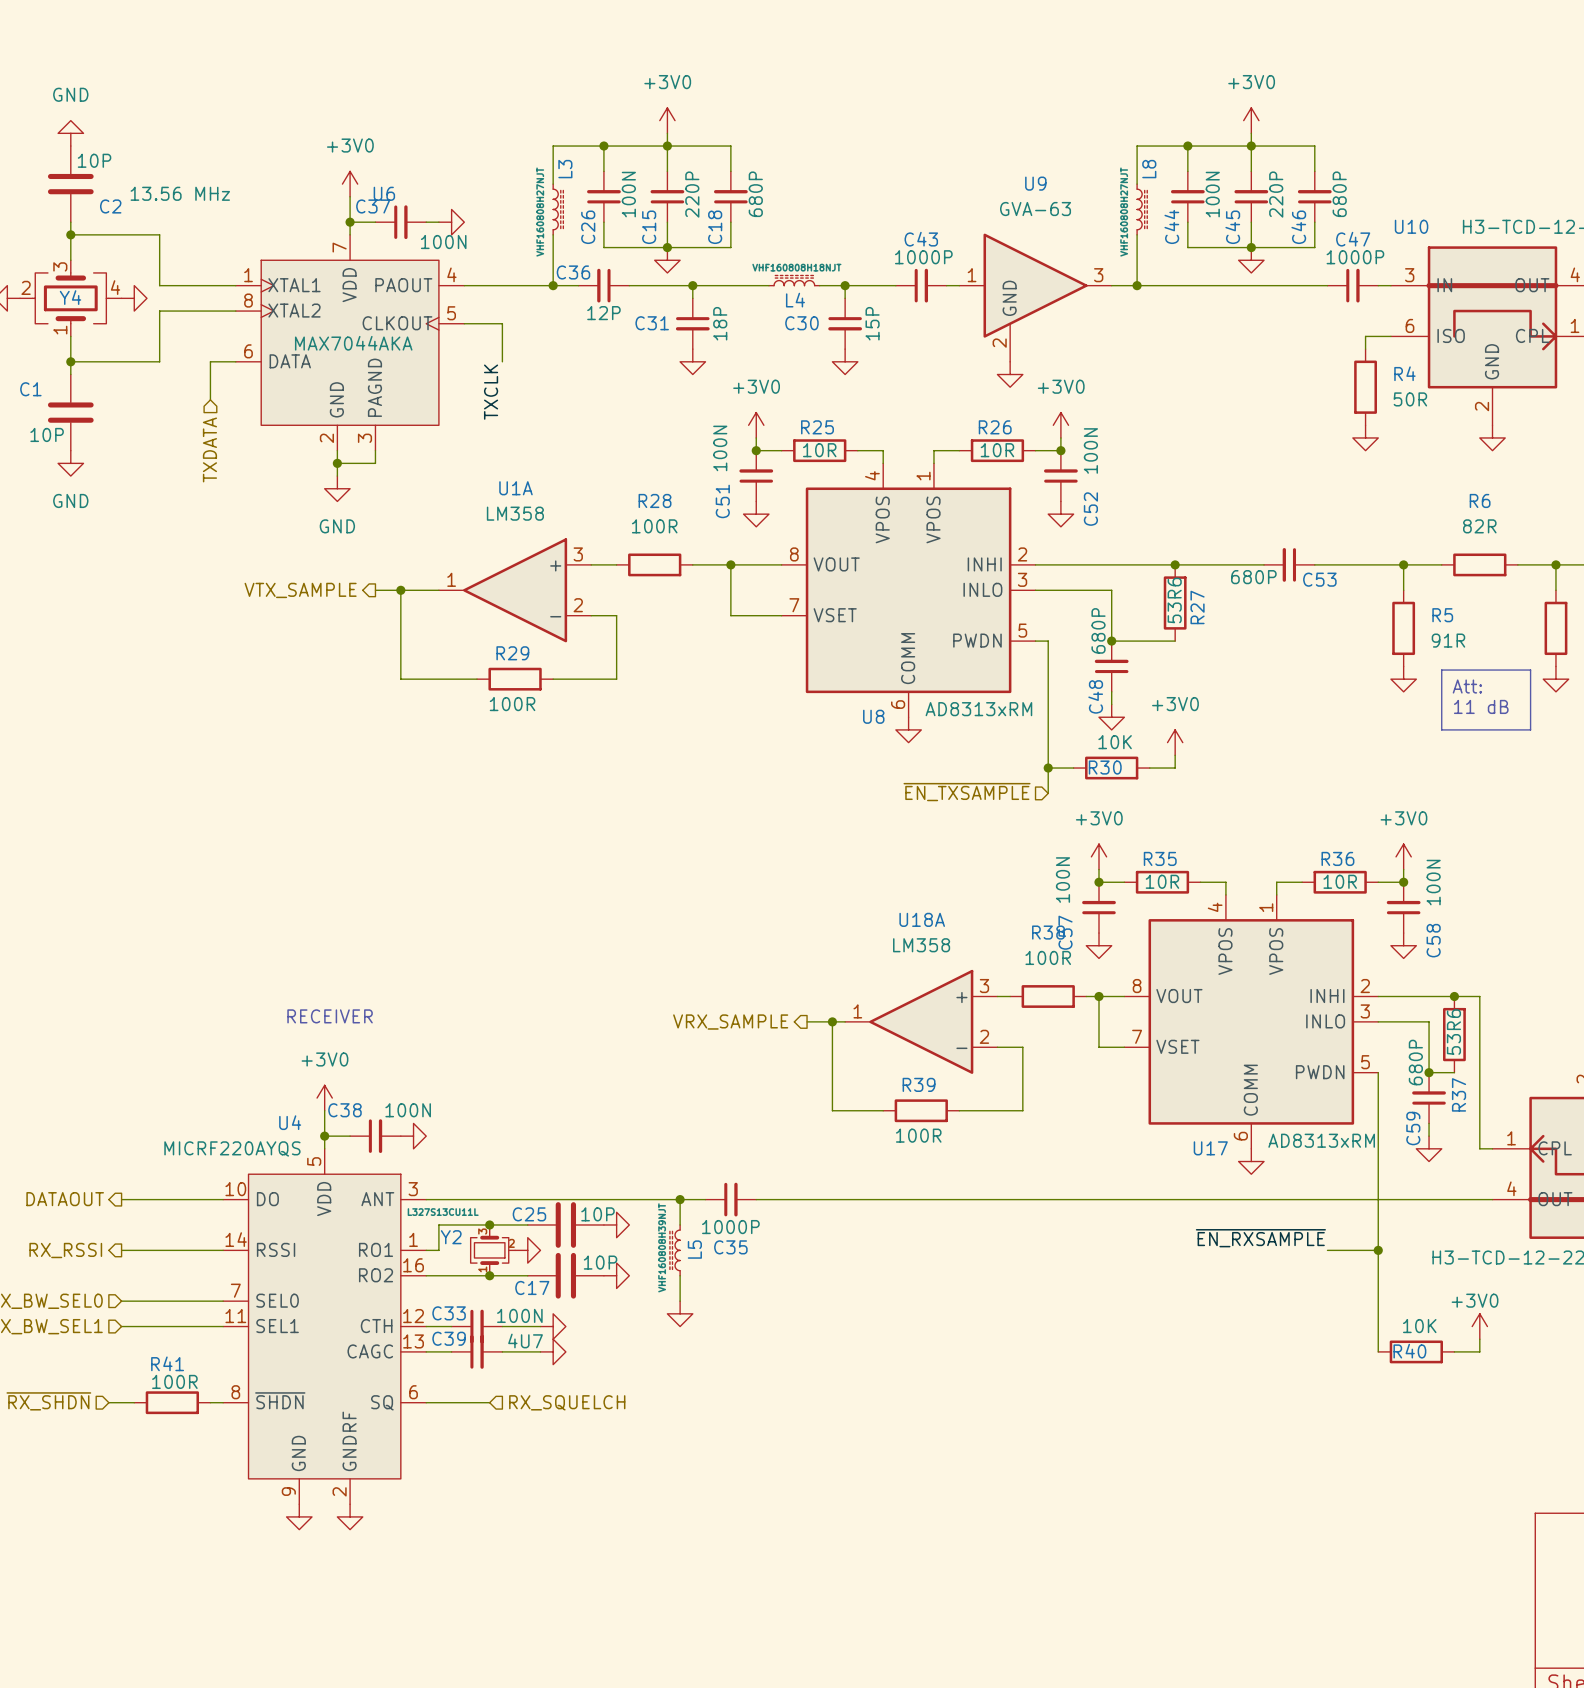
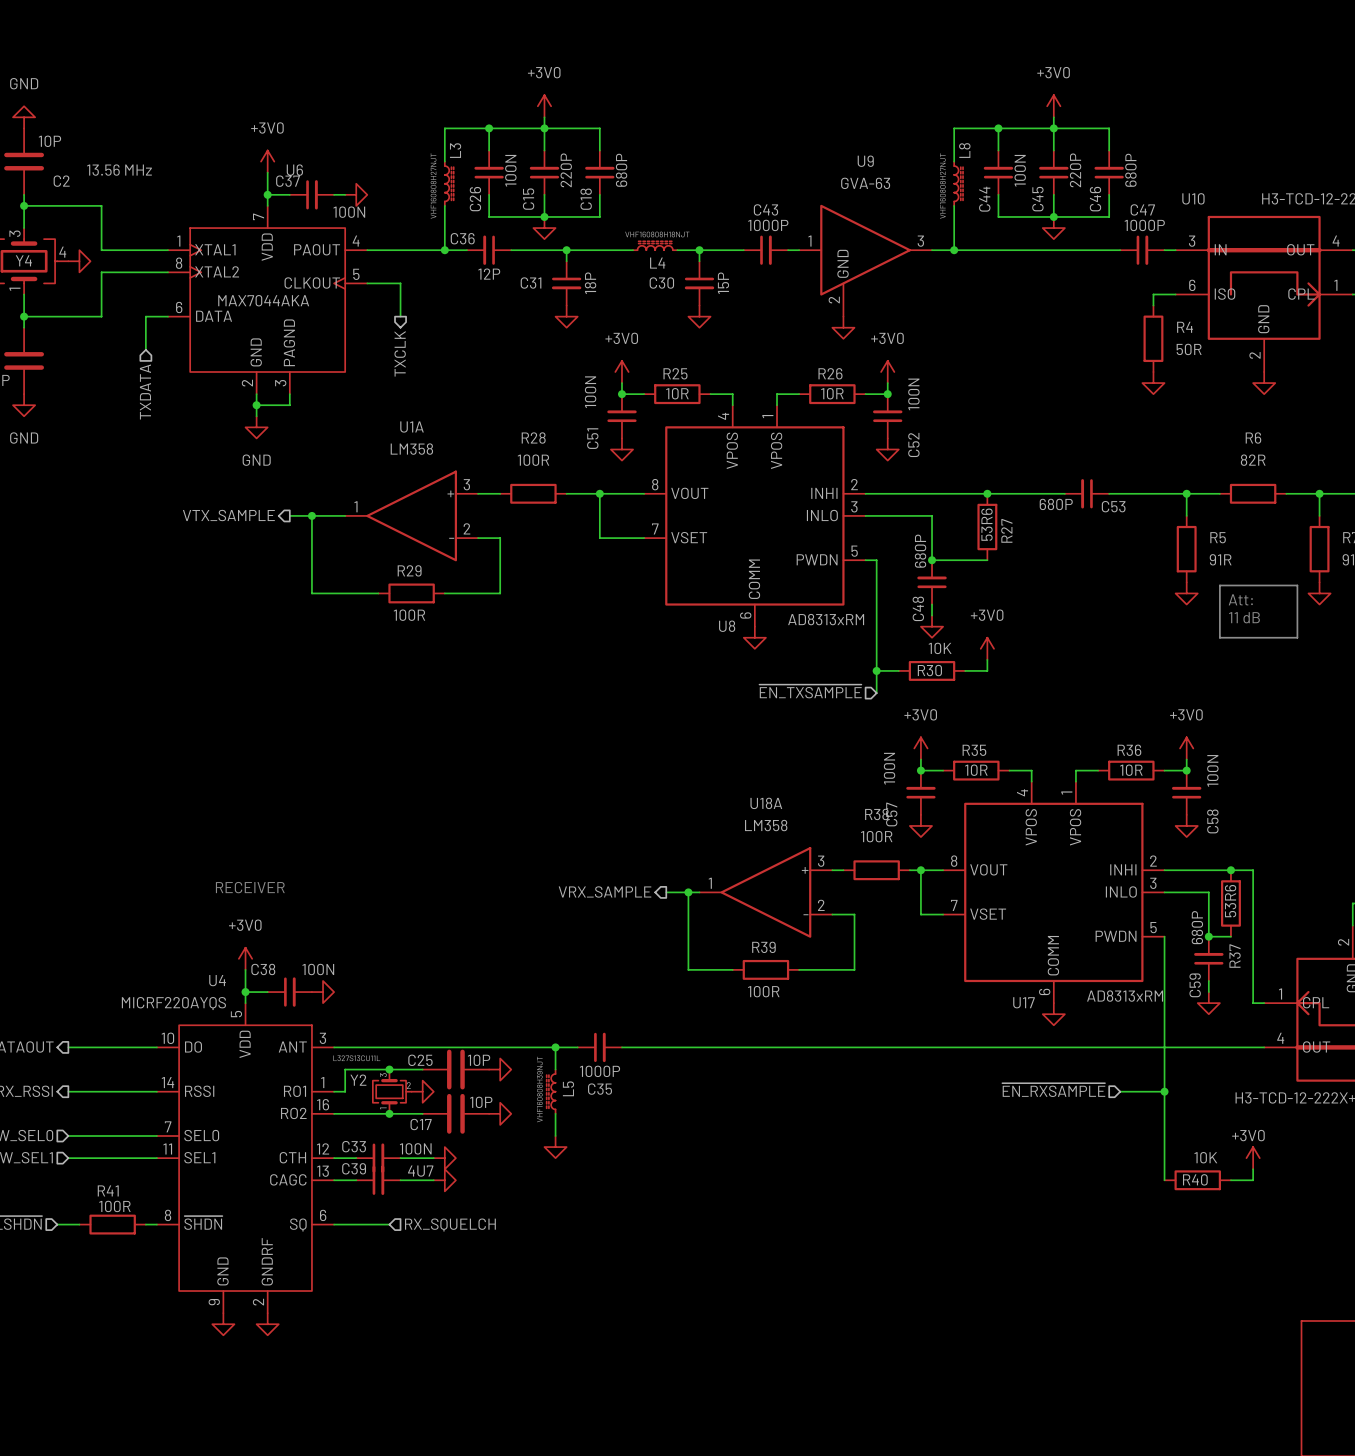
label: TXCLK (491, 392) -> none
hierarchical label: none -> TXCLK (400, 353)
label: ~{EN_RXSAMPLE} (1260, 1238) -> none
hierarchical label: none -> ~{EN_RXSAMPLE} (1053, 1090)

